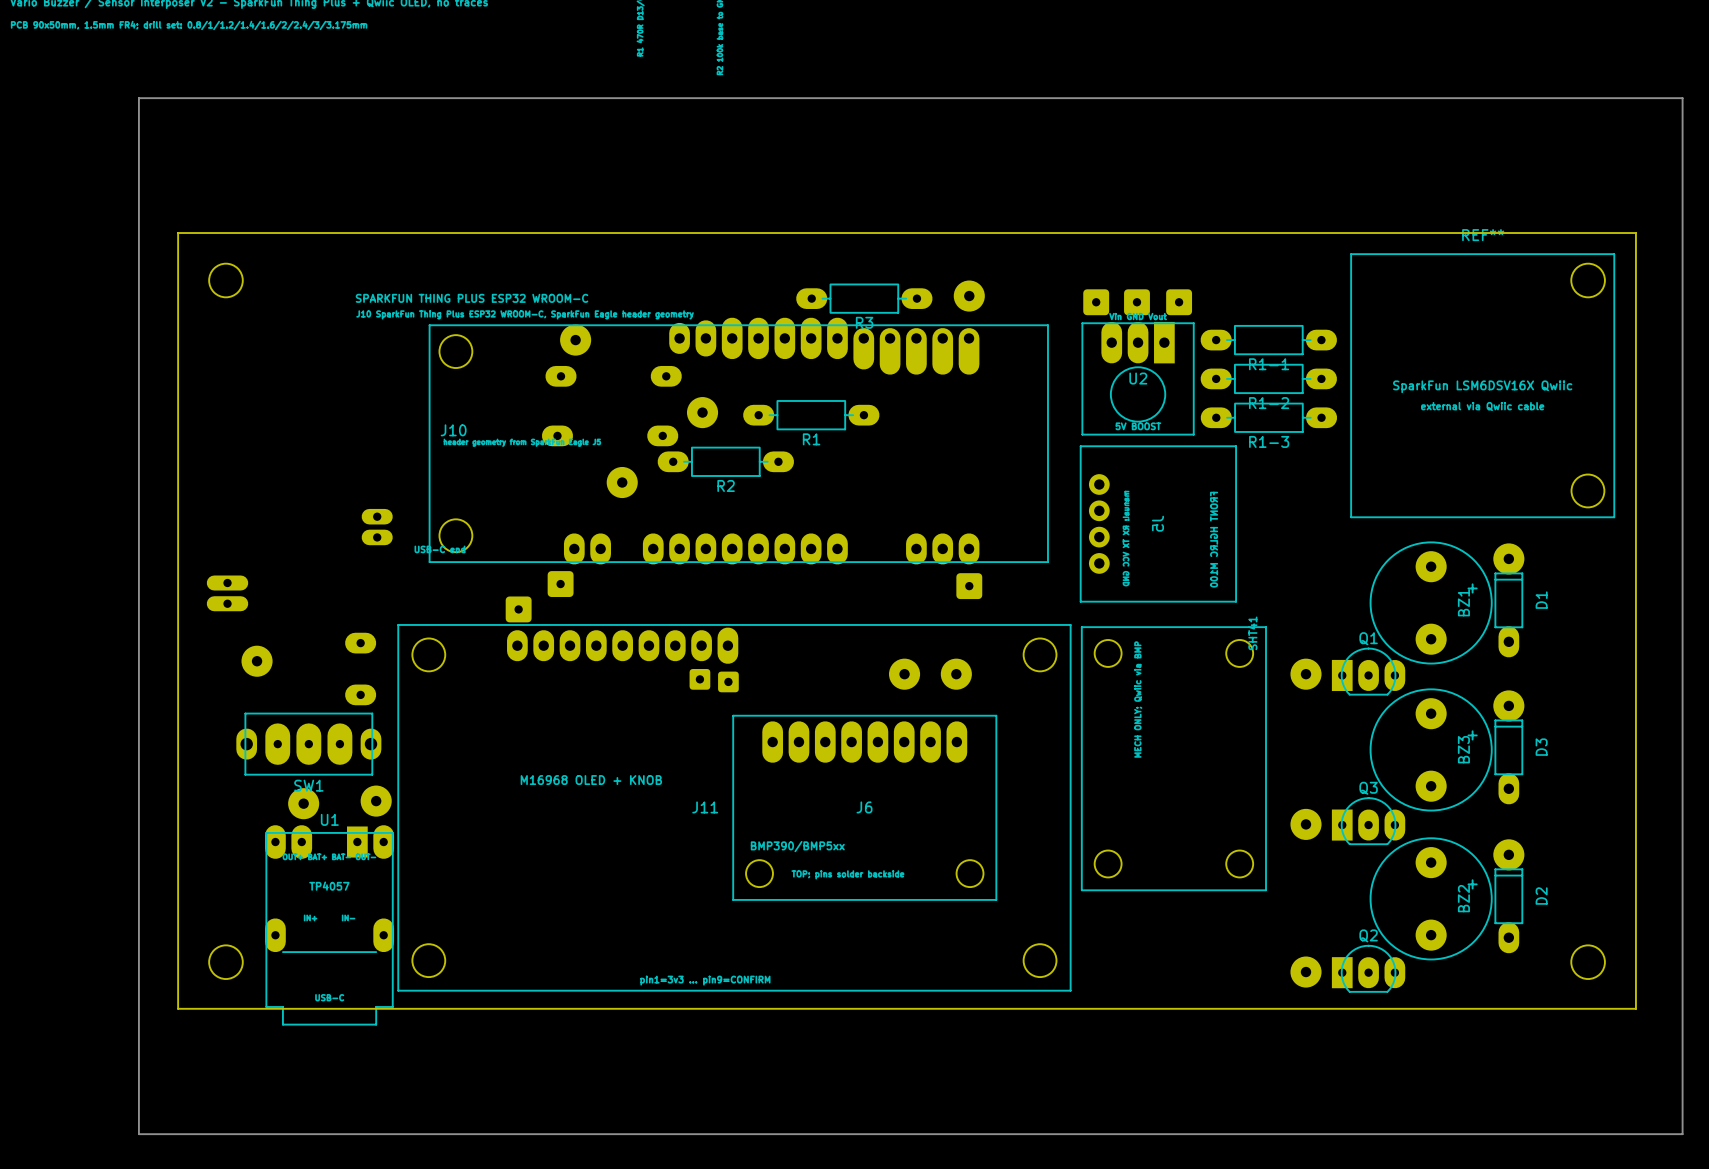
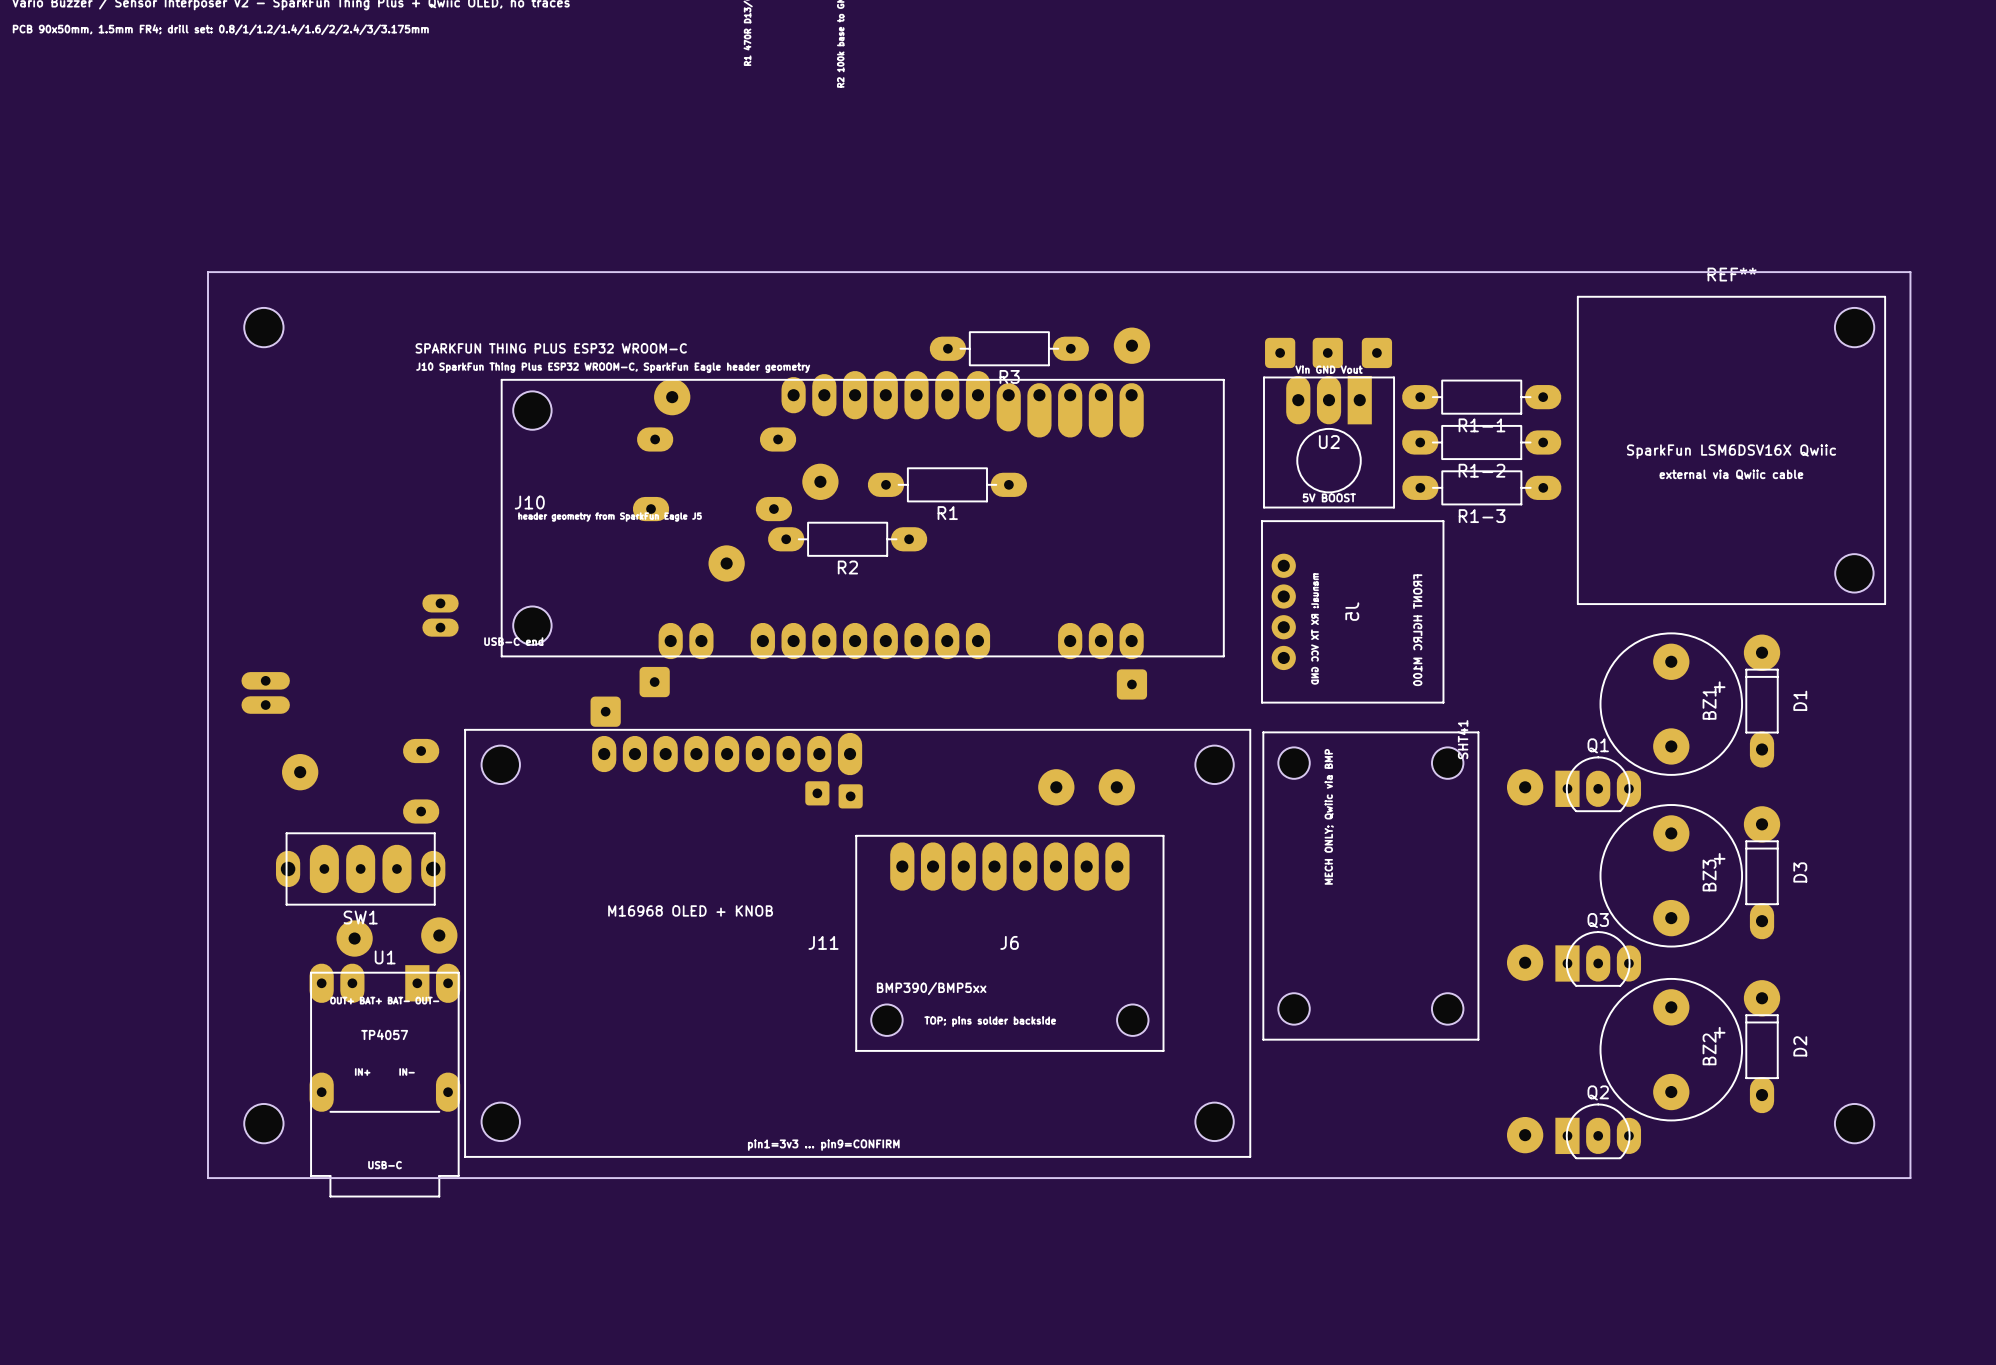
line: (138, 98) (1682, 98) (1682, 1134) (138, 1134) (138, 98) -> none

